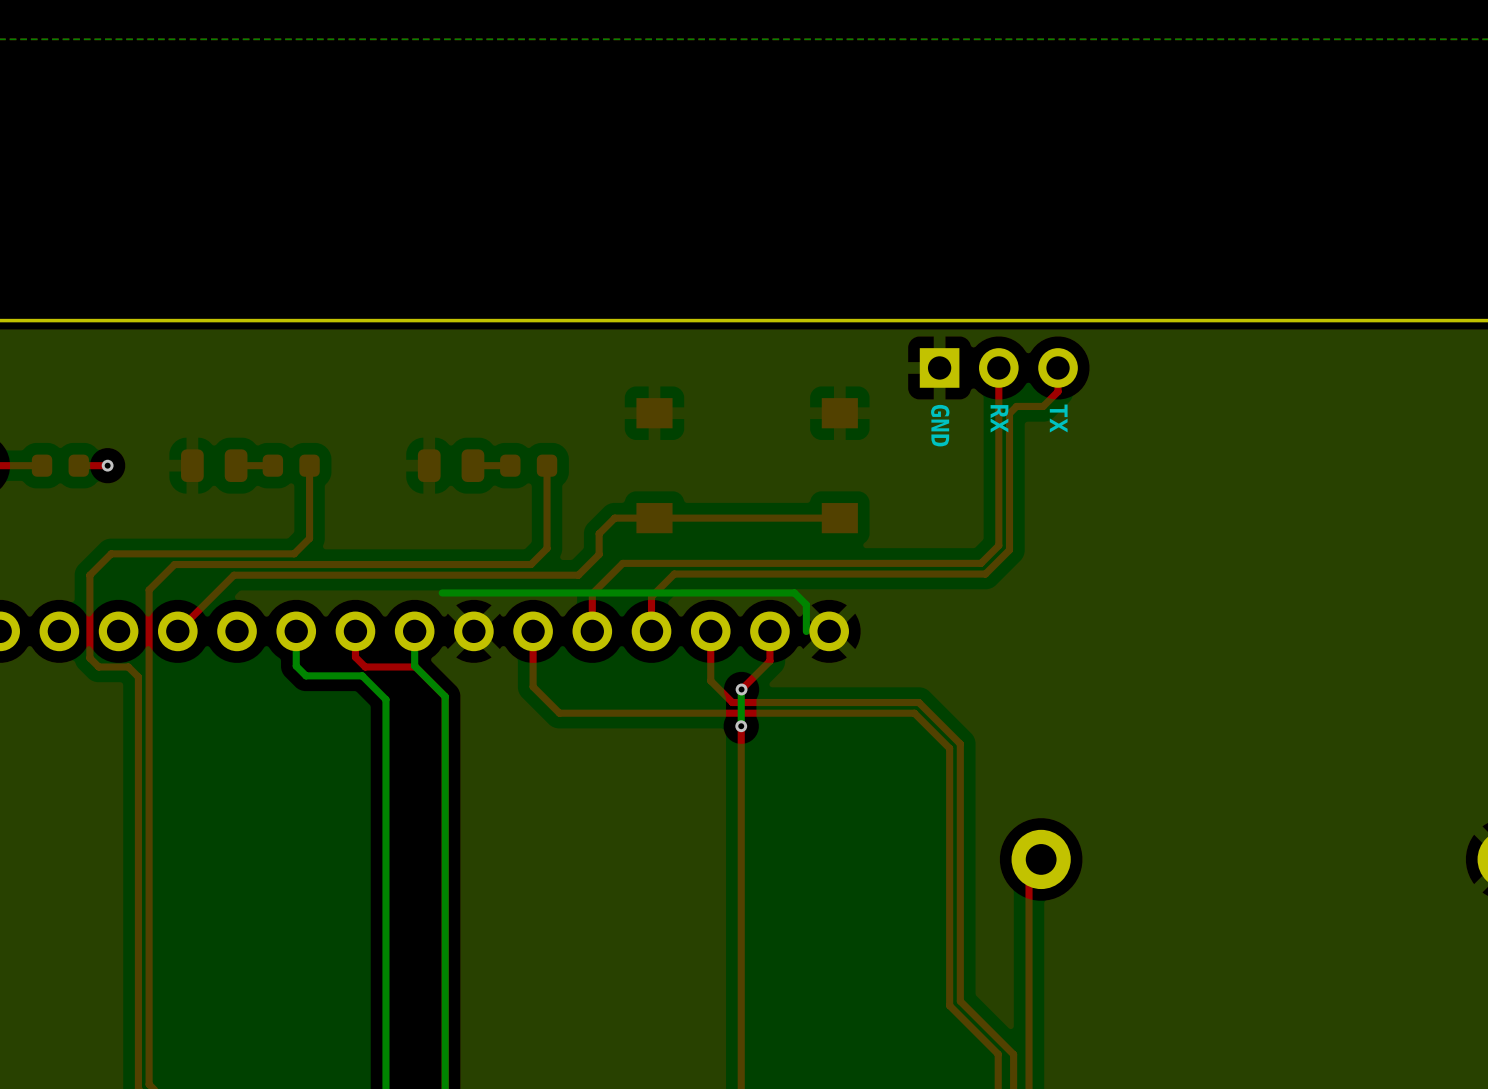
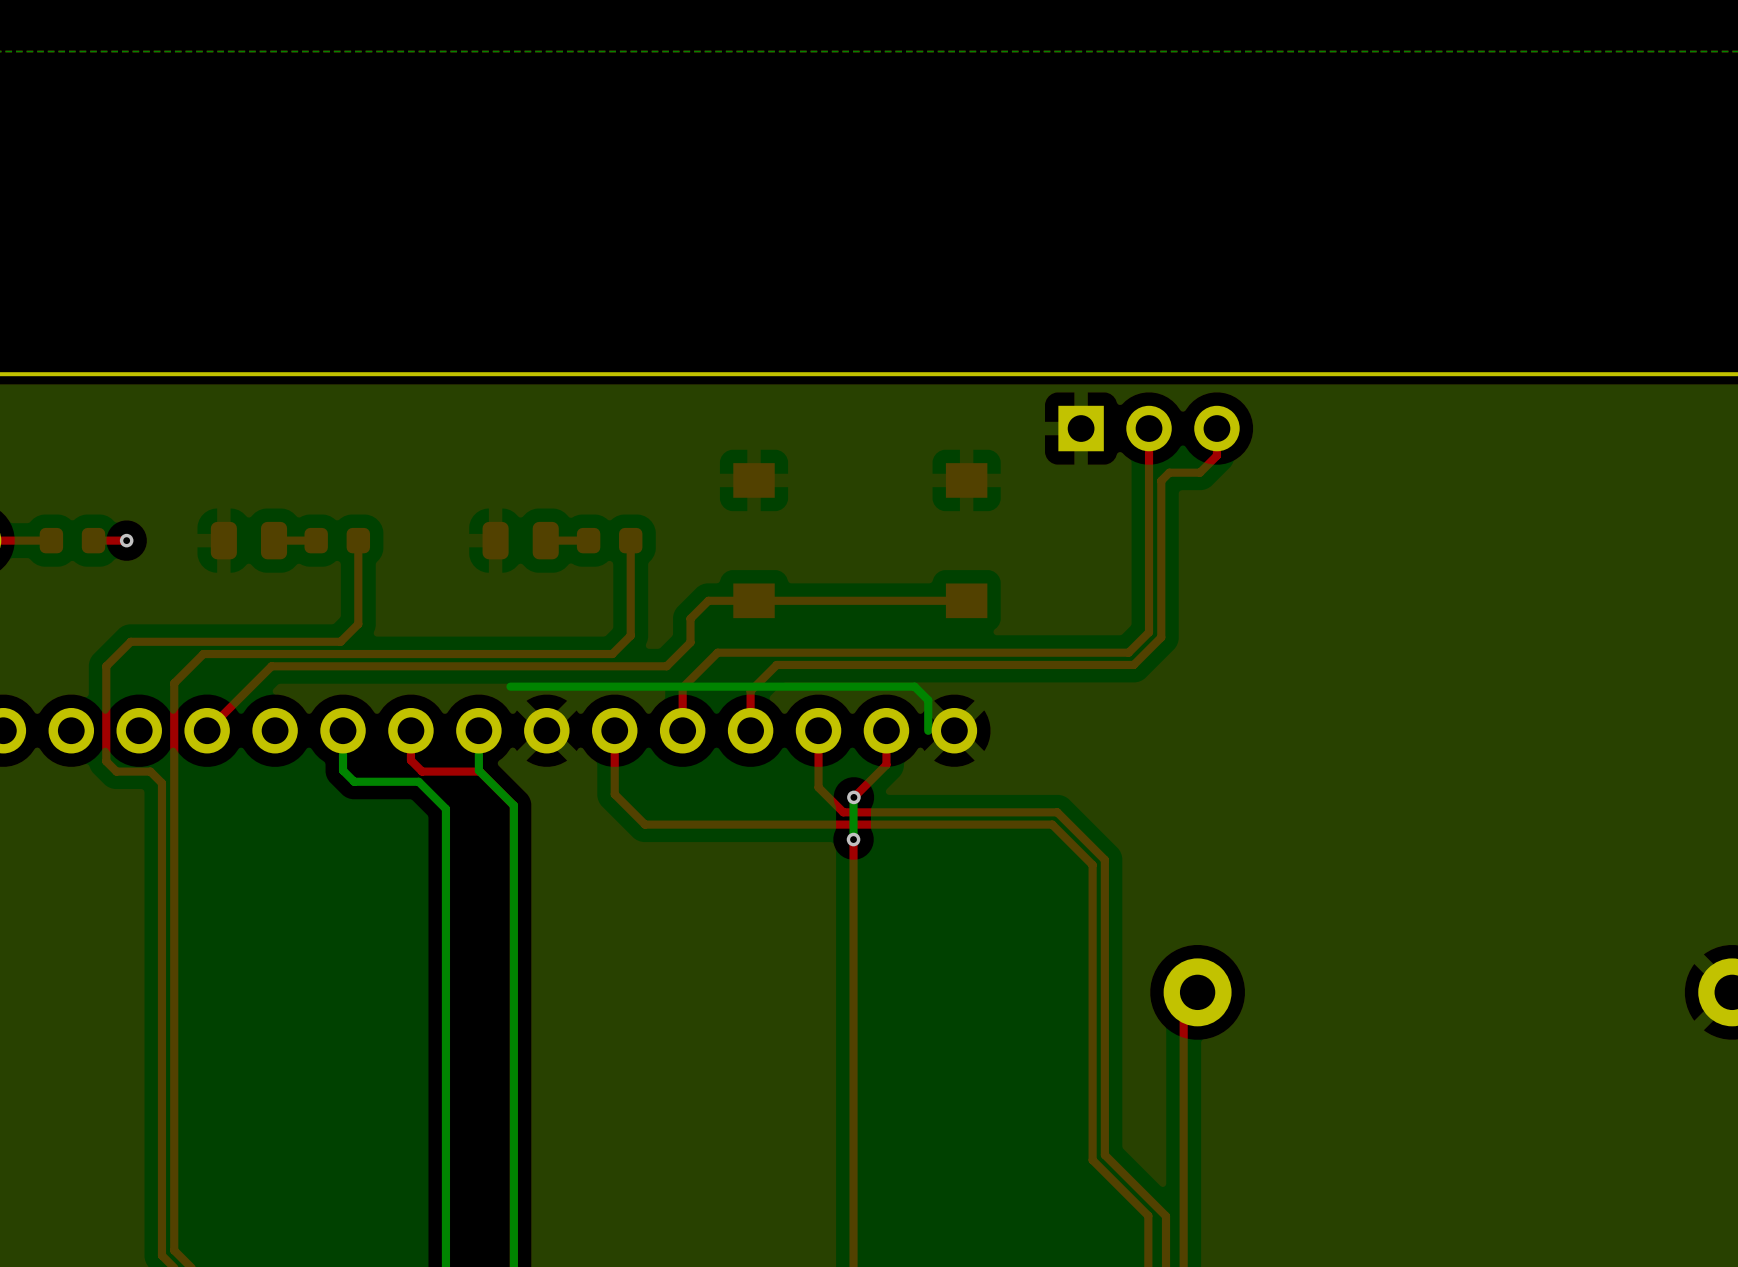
text: RX (999, 418) -> none
text: TX (1058, 418) -> none
text: GND (940, 425) -> none

